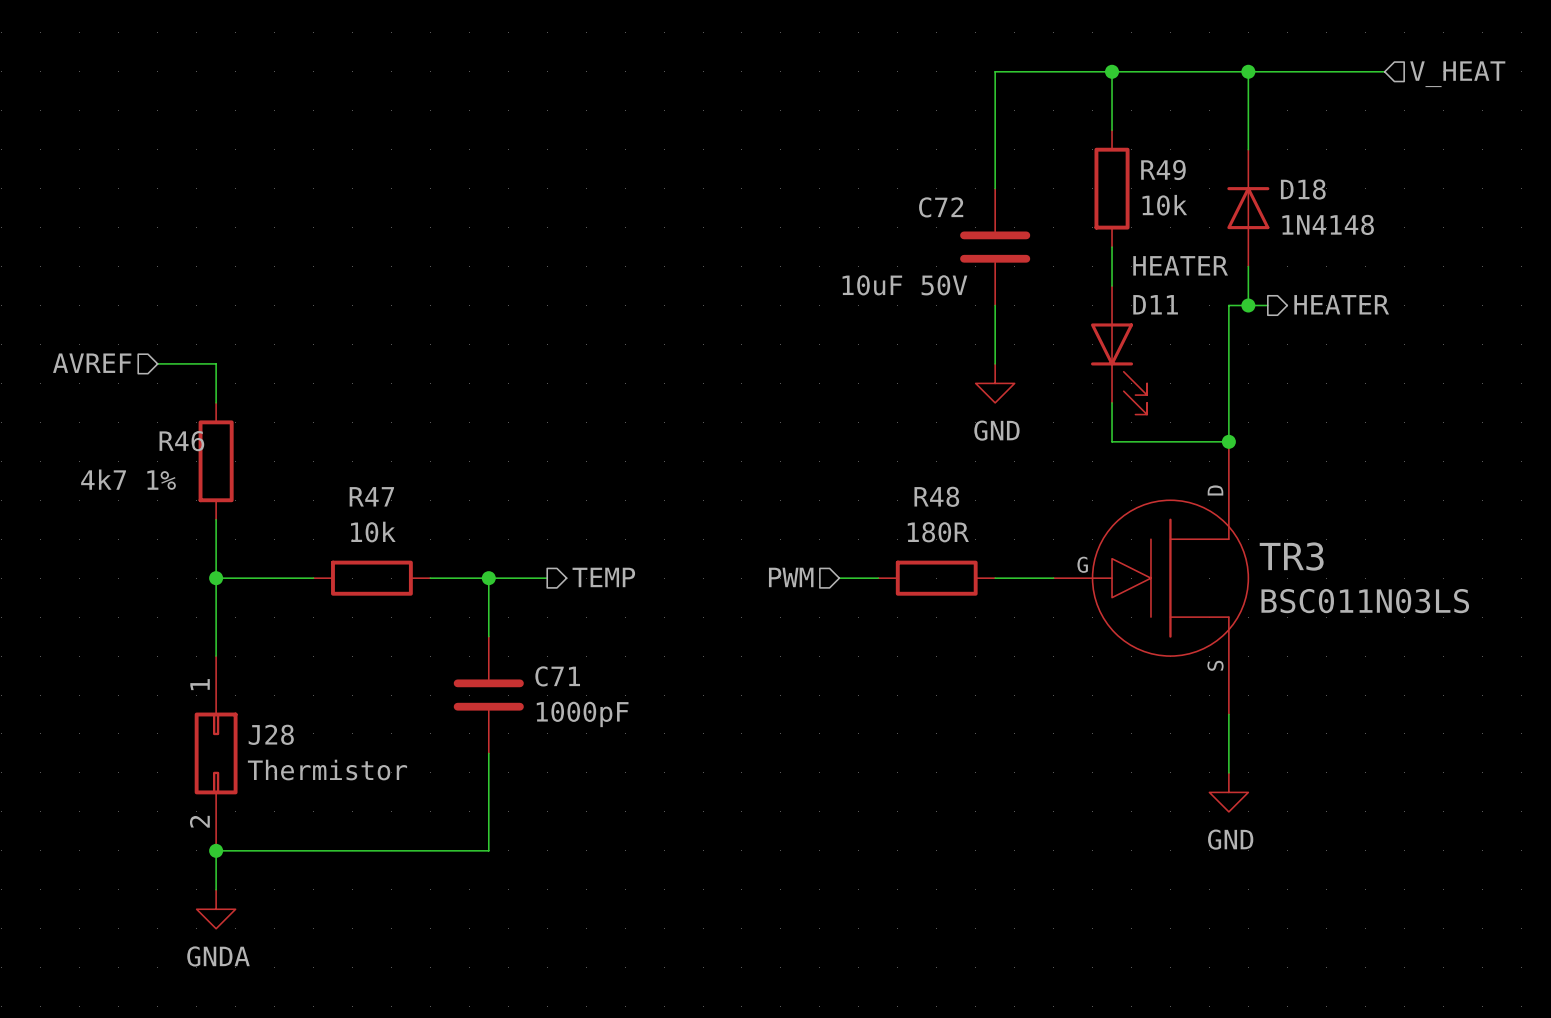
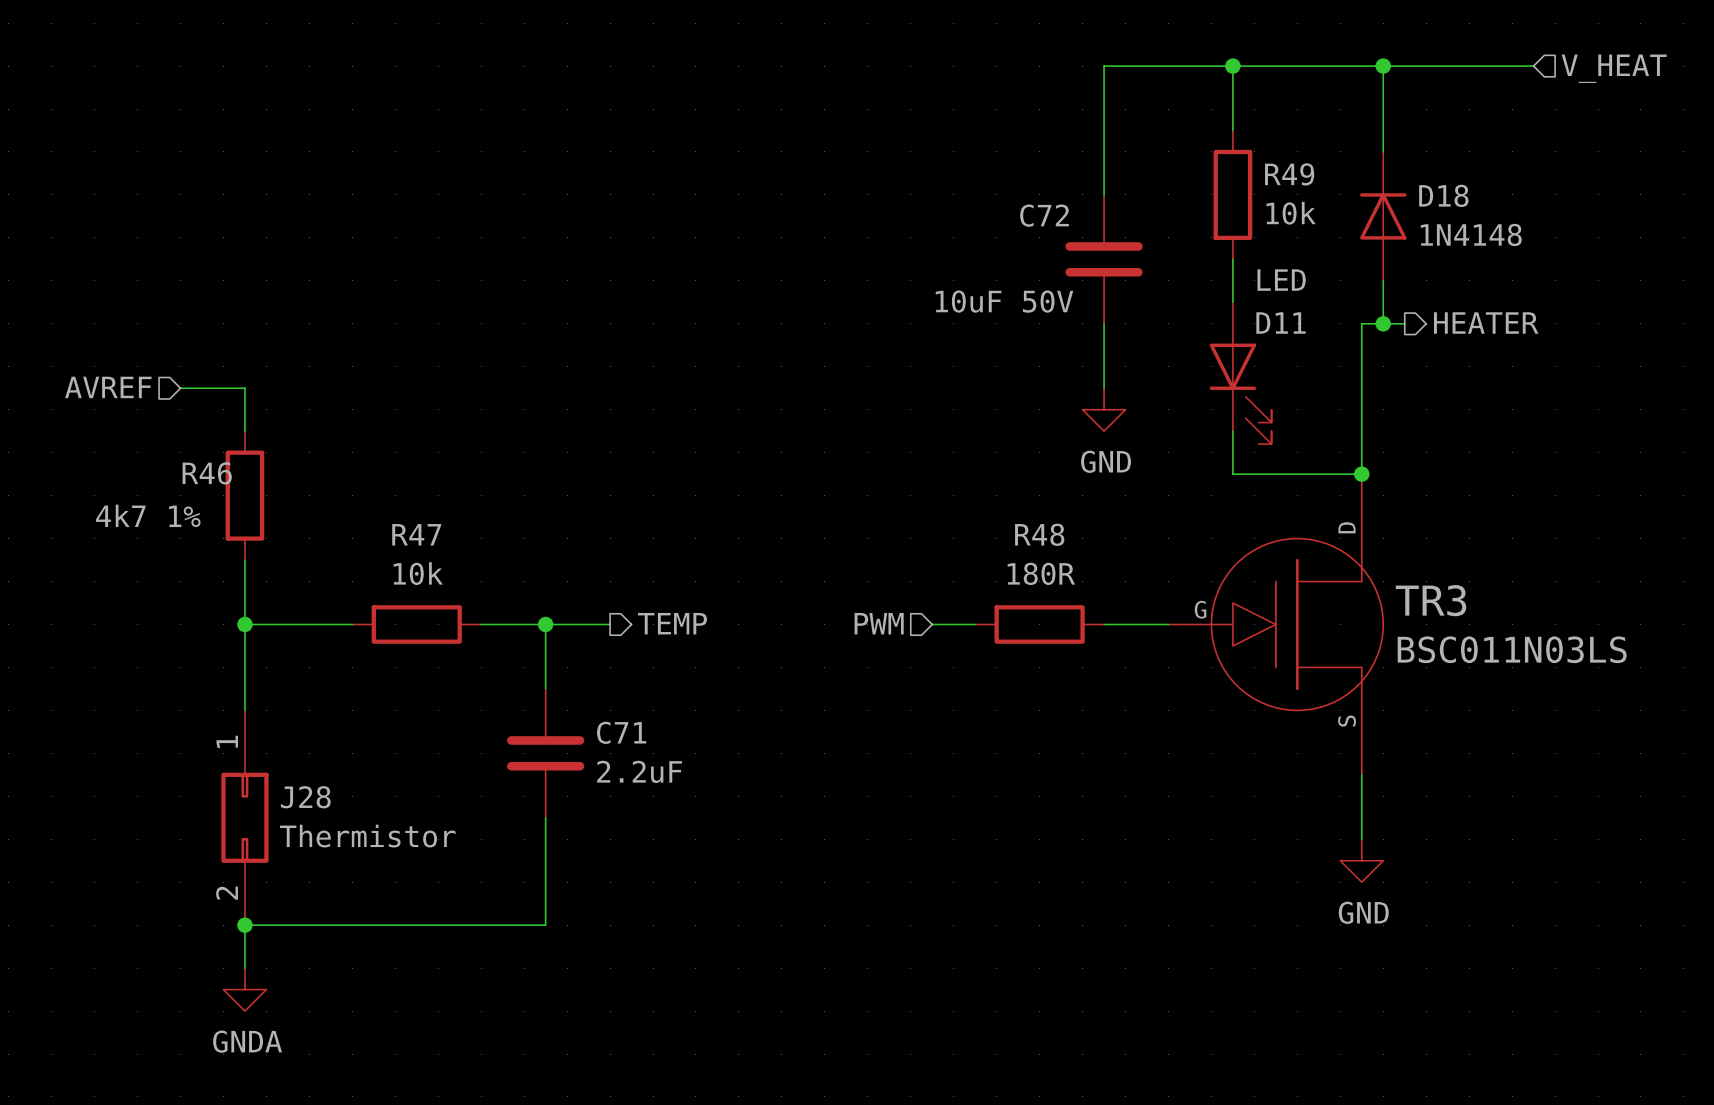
D11 value: HEATER (1180, 265) -> LED (1281, 280)
C71 value: 1000pF (582, 714) -> 2.2uF (639, 771)

